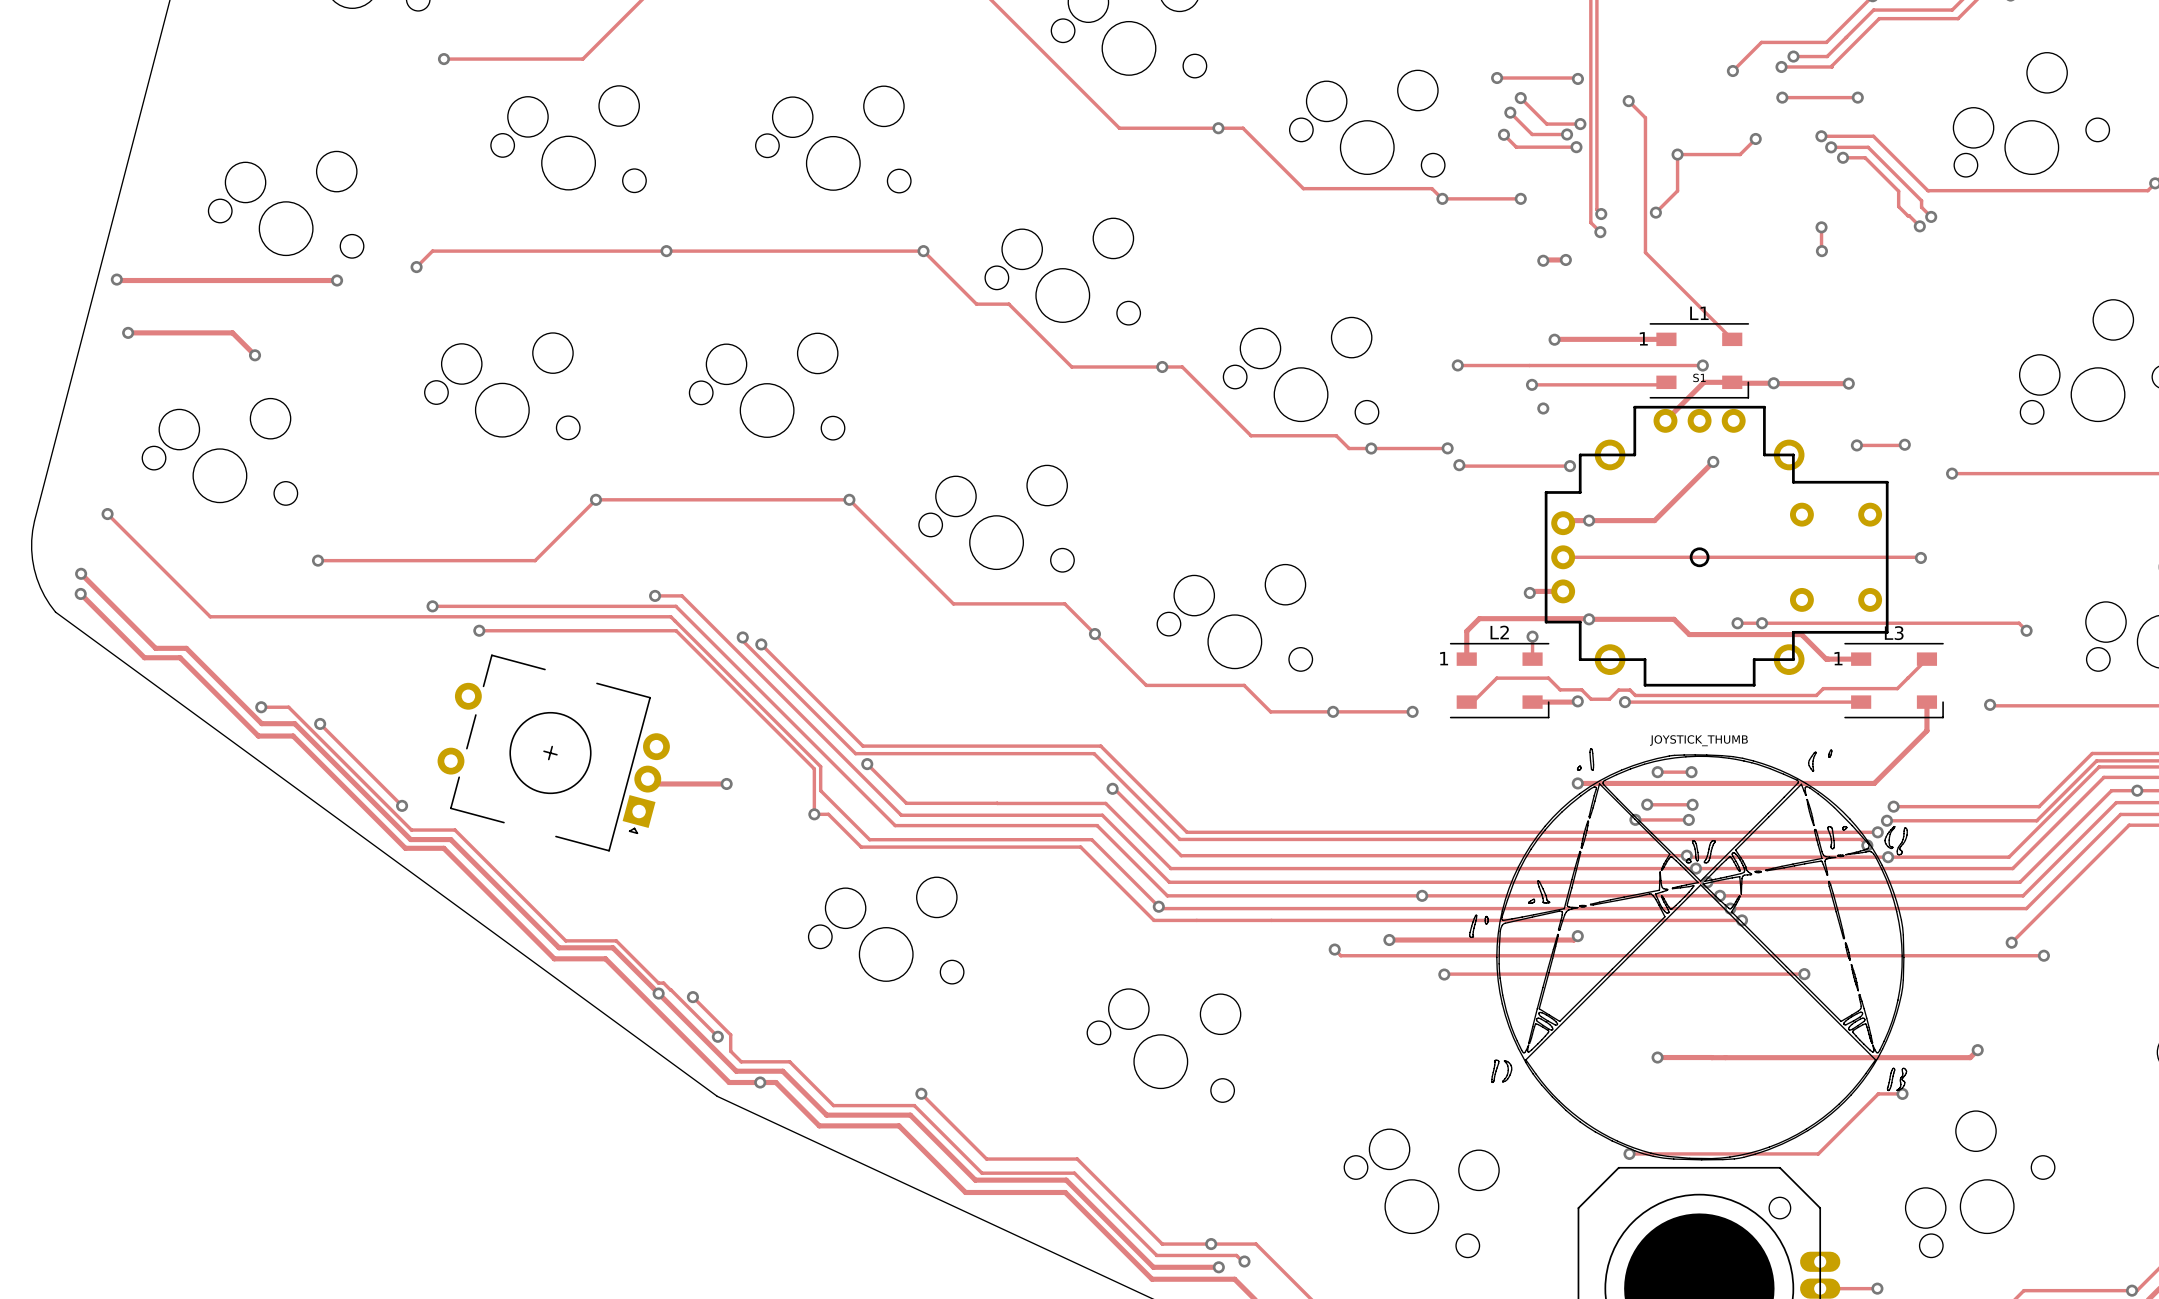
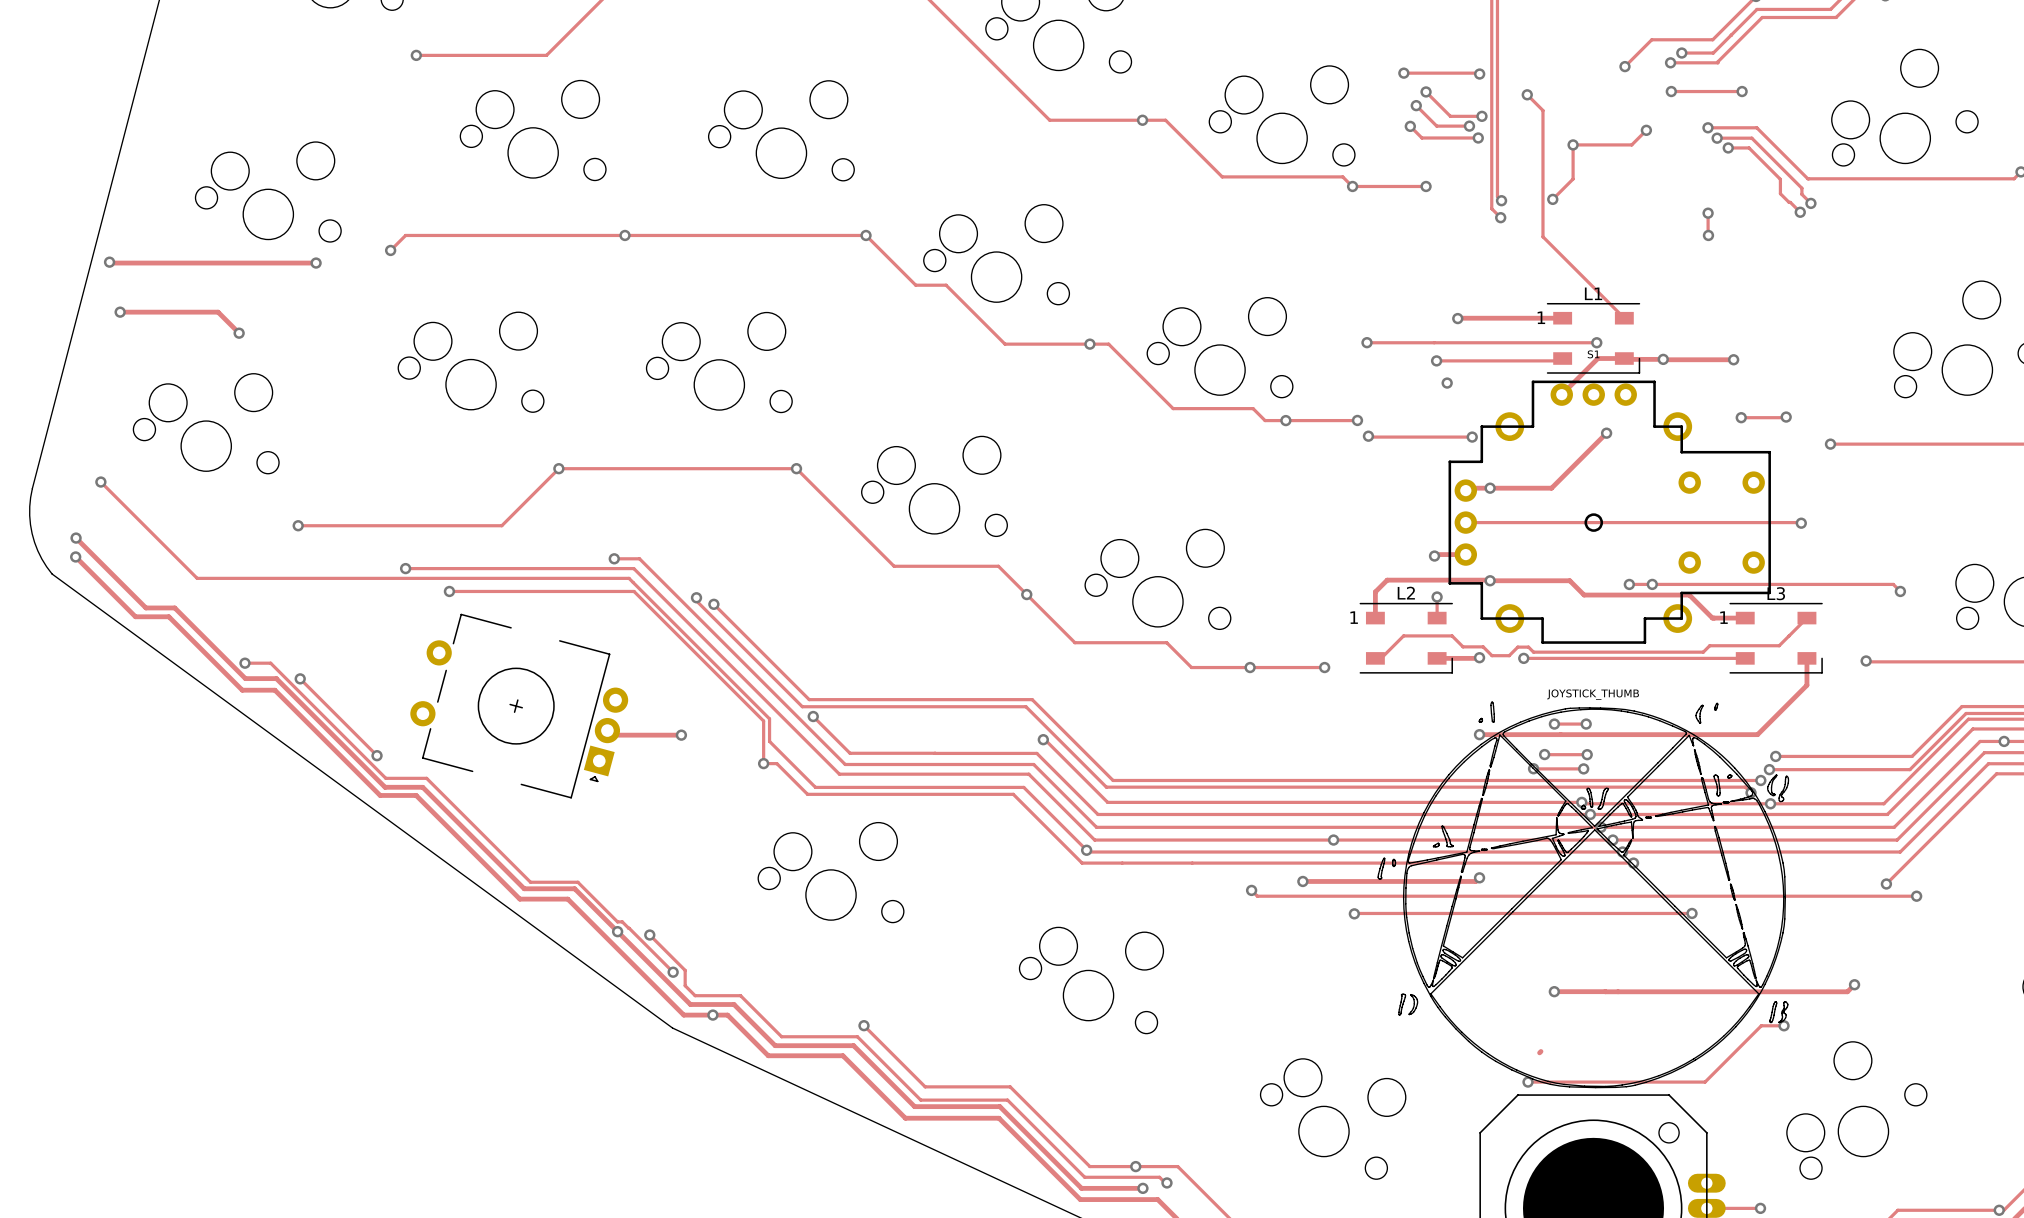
track: (1565, 259) (1543, 260) -> none
via: (1565, 259) -> none
via: (1543, 260) -> none
track: none -> (1540, 1051) (1539, 1052)

